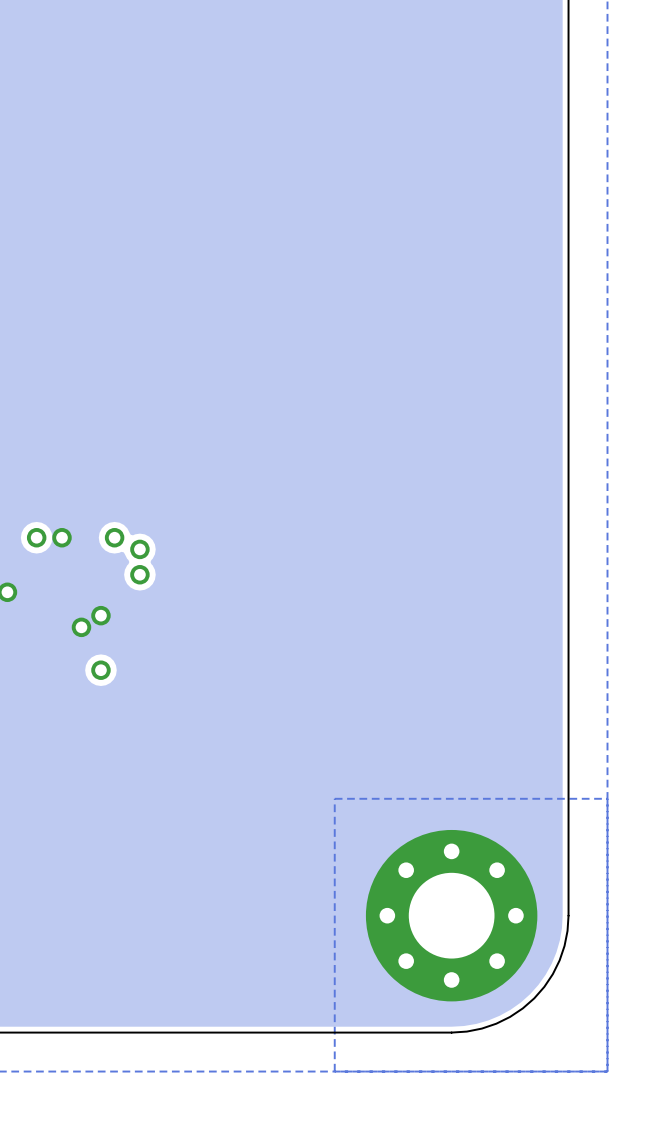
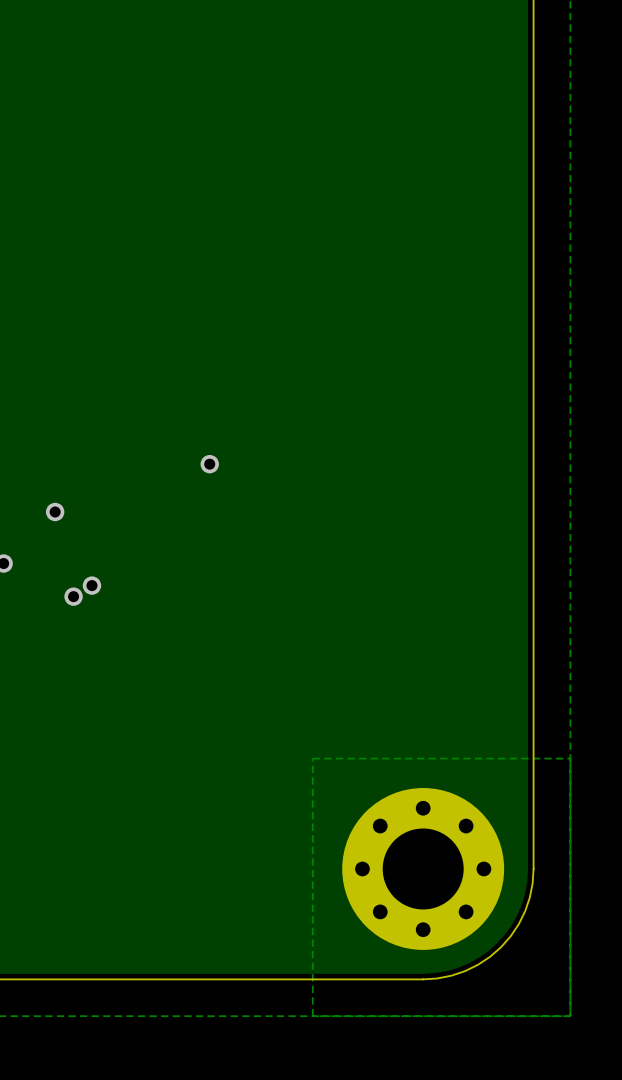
via: none -> (209, 464)
via: (36, 537) -> none
via: (114, 537) -> none
via: (139, 549) -> none
via: (139, 574) -> none
via: (100, 670) -> none

